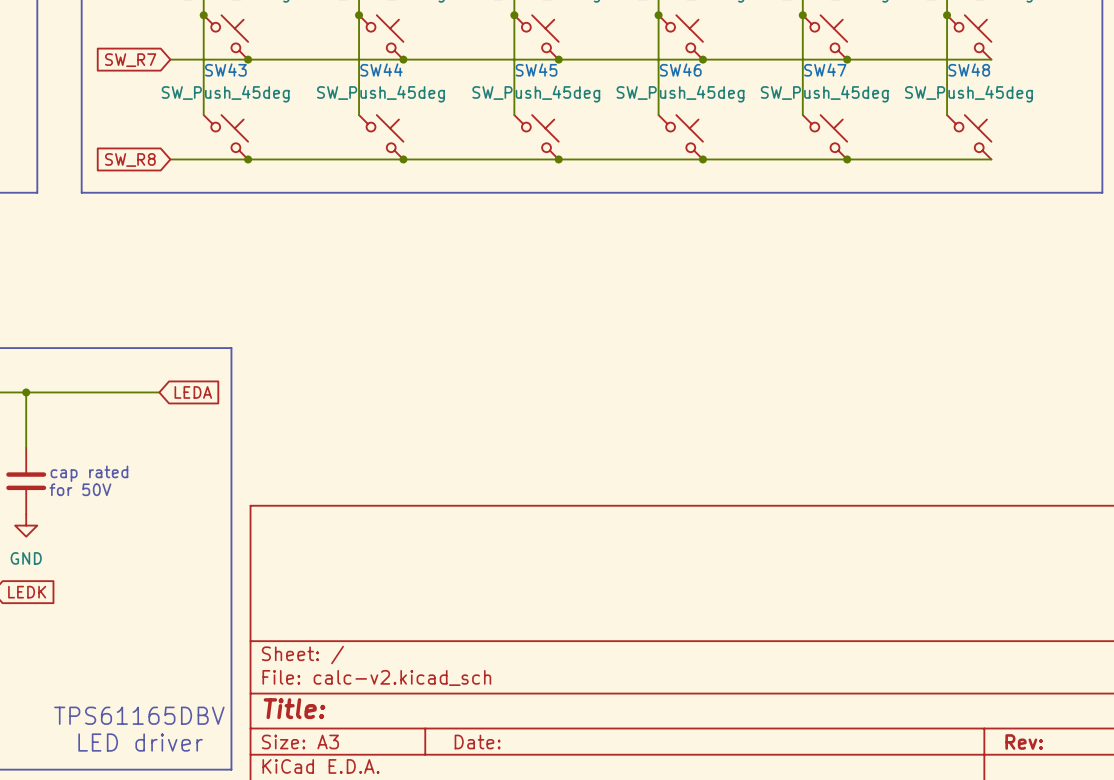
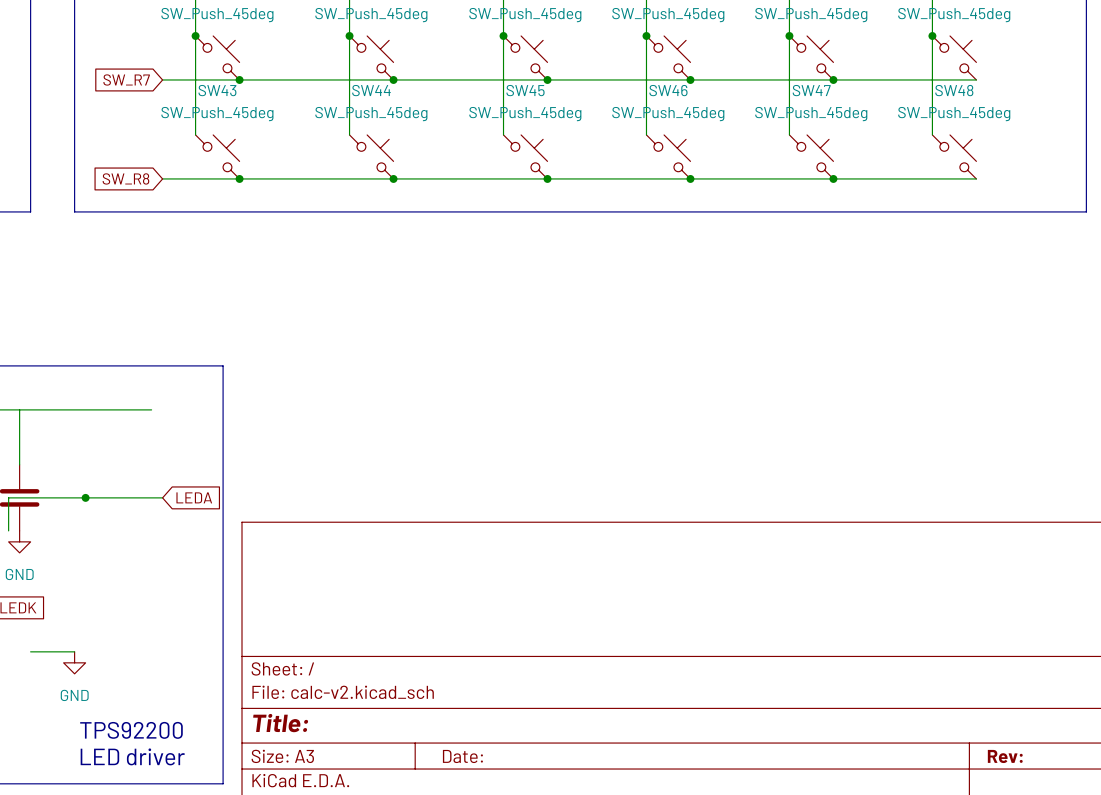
junction: (26, 392) -> none
global label position: LEDA (193, 392) -> LEDA (194, 497)
text: cap rated (89, 473) -> none
junction: none -> (85, 497)
wire: none -> (162, 497) (8, 497) (8, 530)
text: for 50V (80, 489) -> none
wire: none -> (30, 651) (74, 651)
power symbol: none -> GND (74, 662)
text: TPS61165DBV (139, 715) -> TPS92200 (131, 730)

